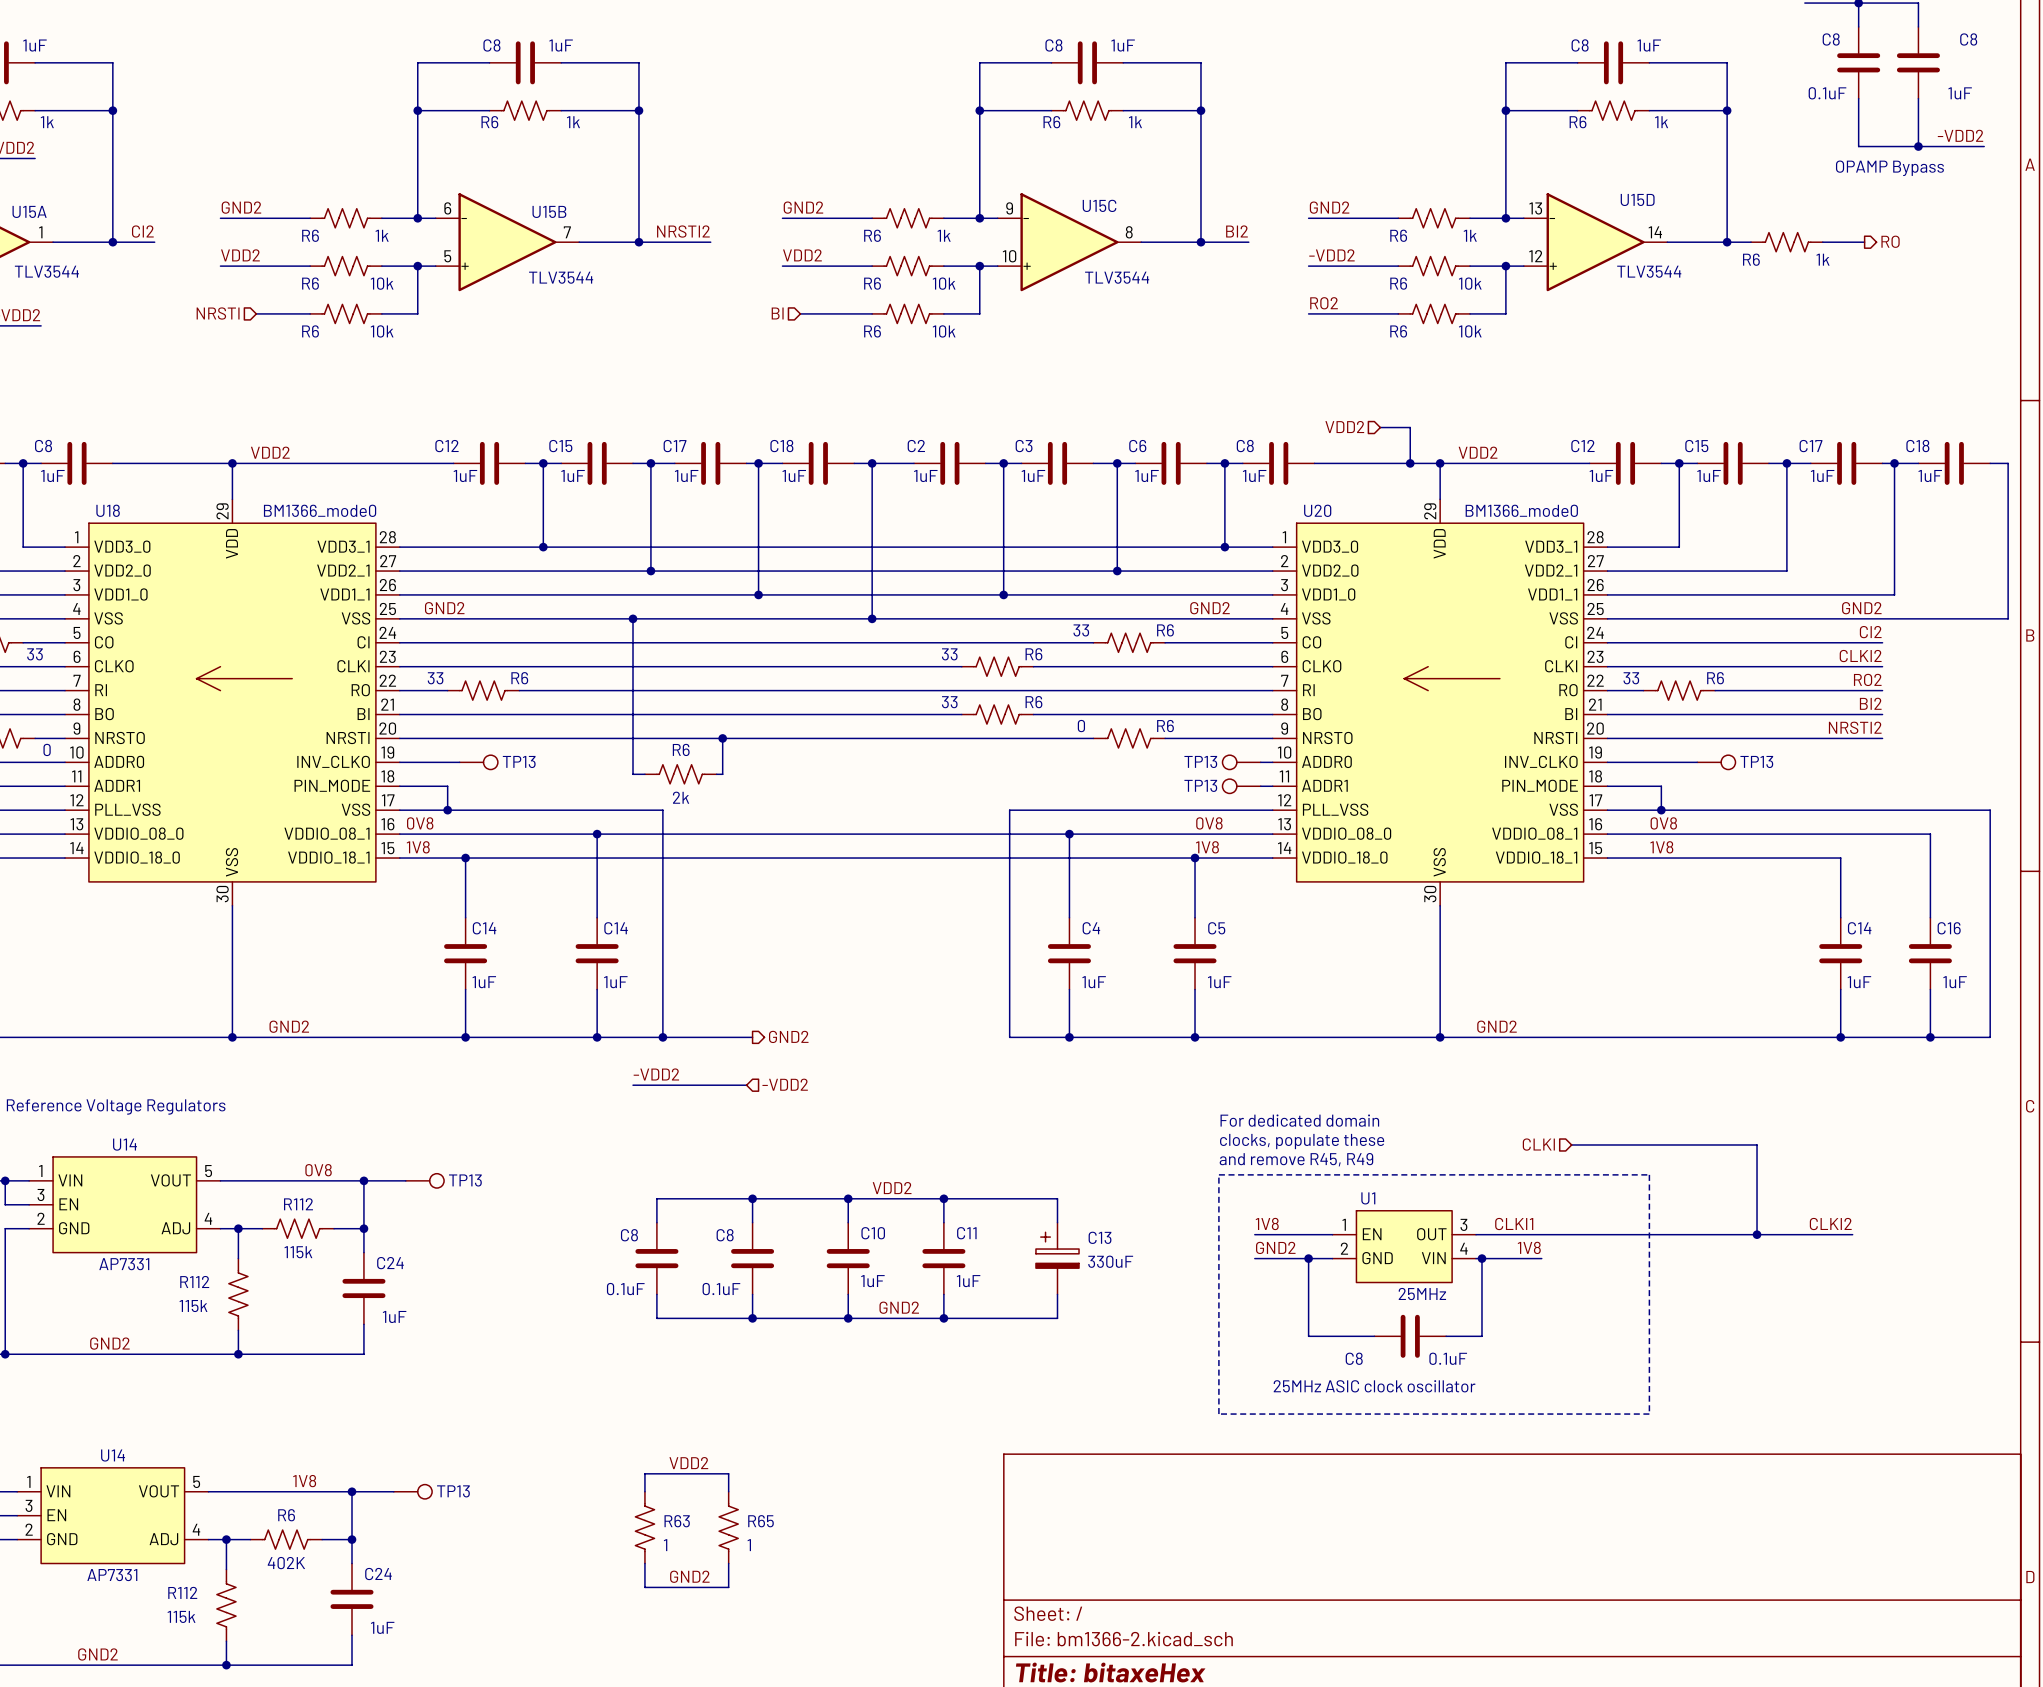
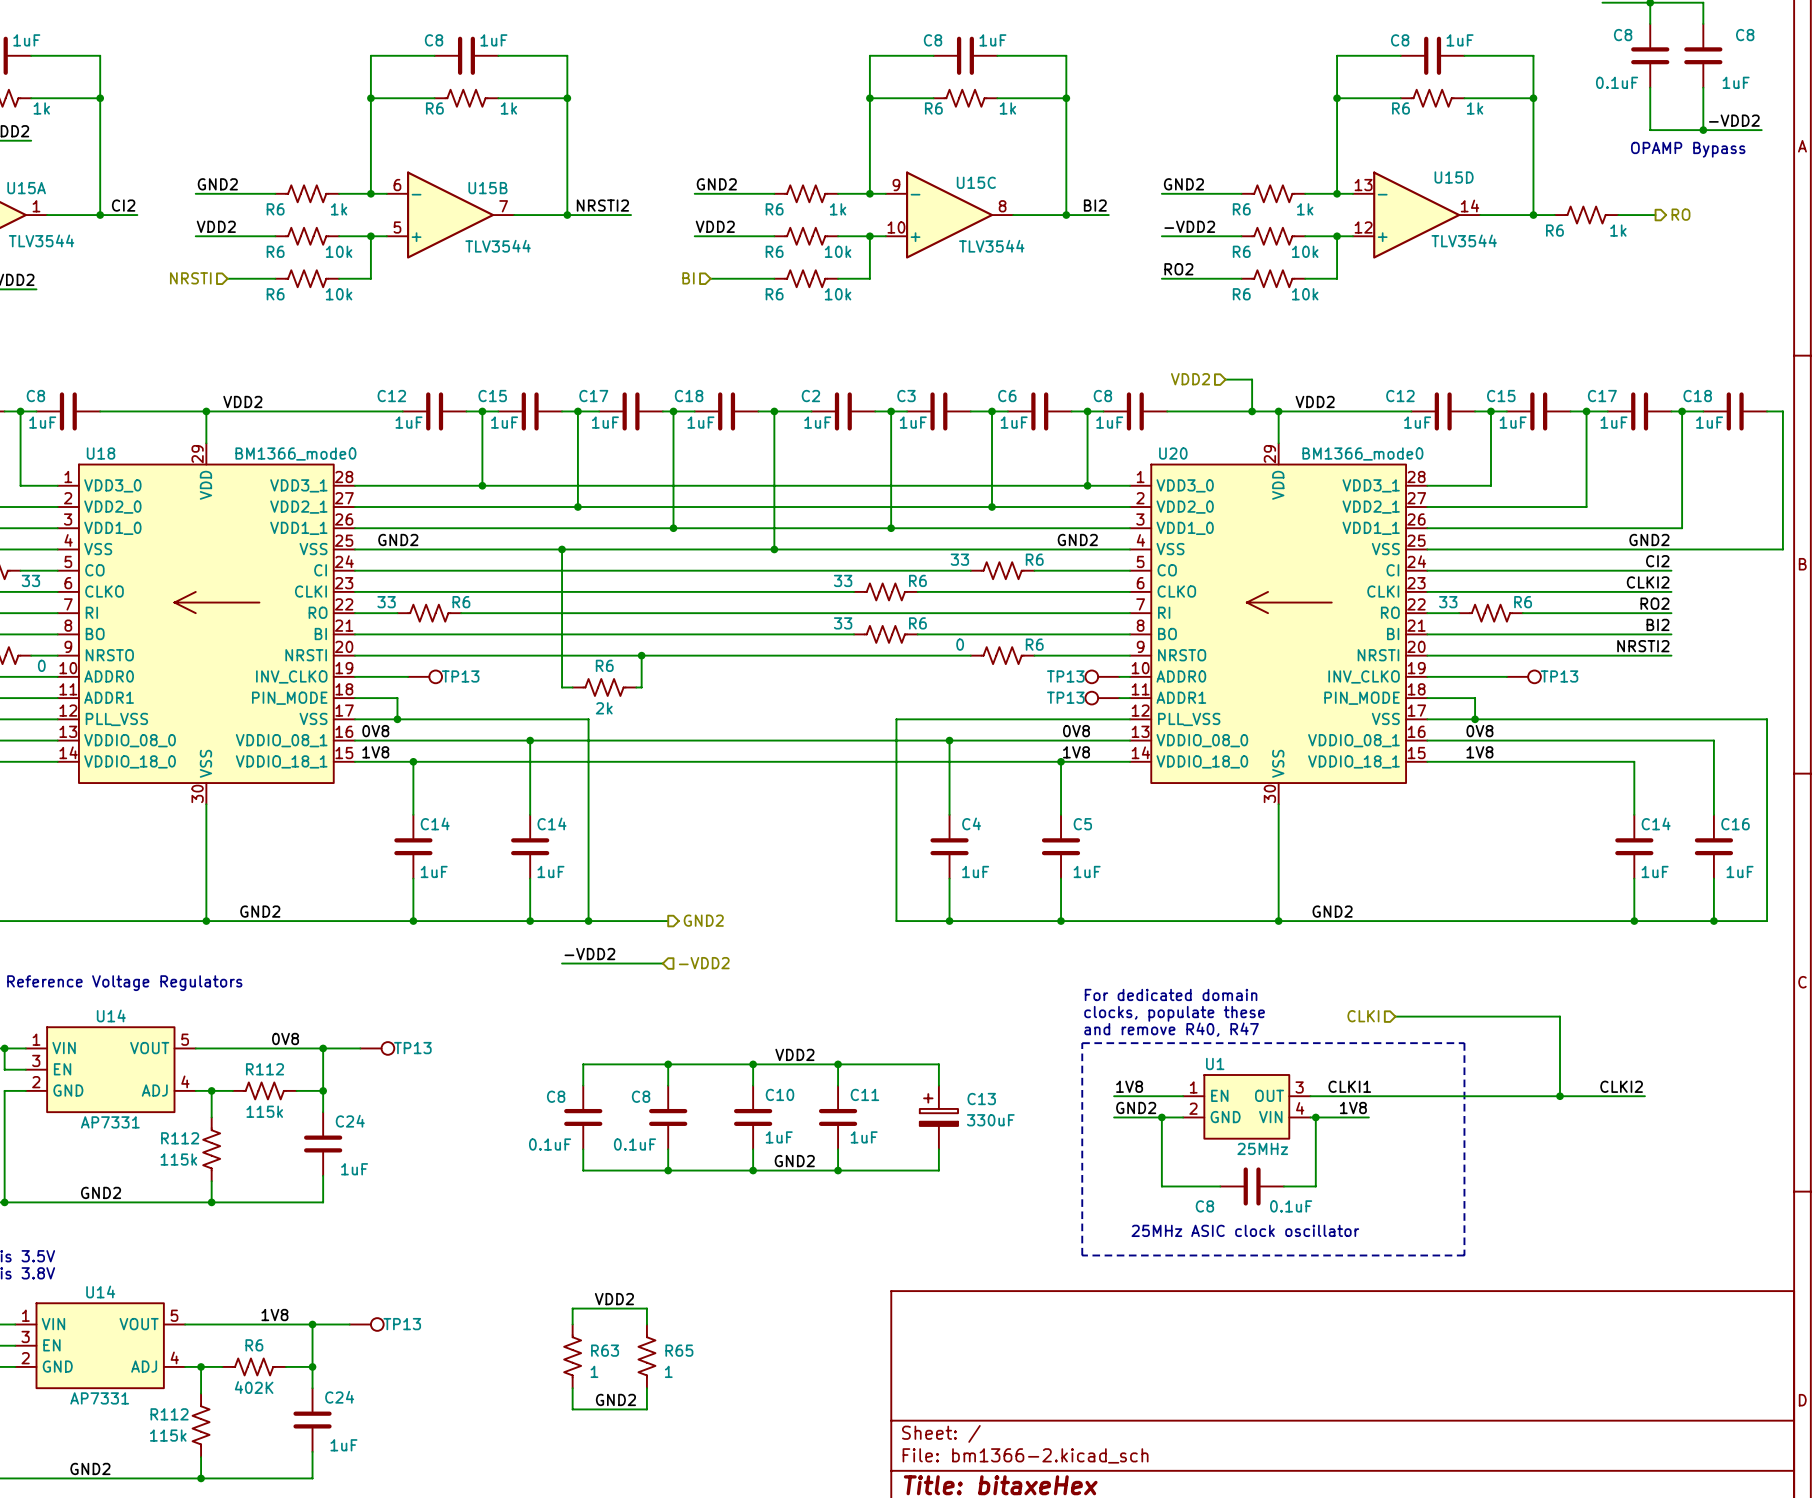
text: and remove R45, R49 (1296, 1159) -> and remove R40, R47 (1171, 1029)

